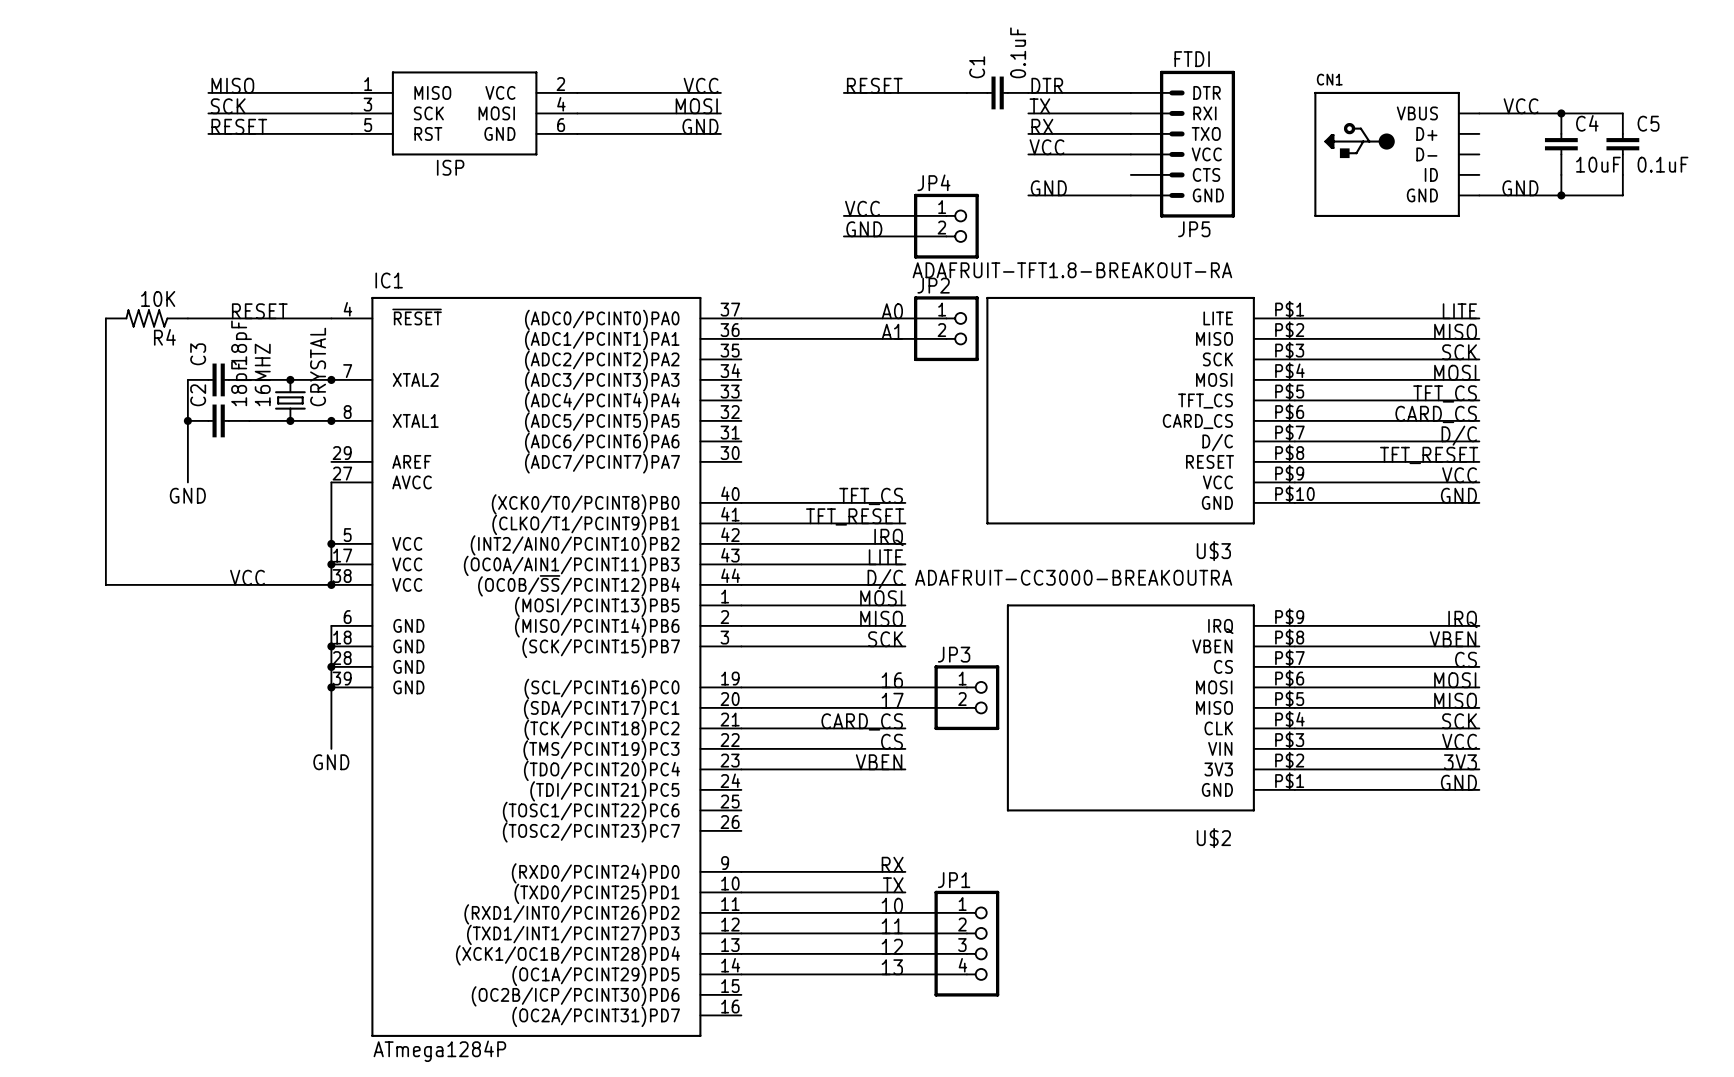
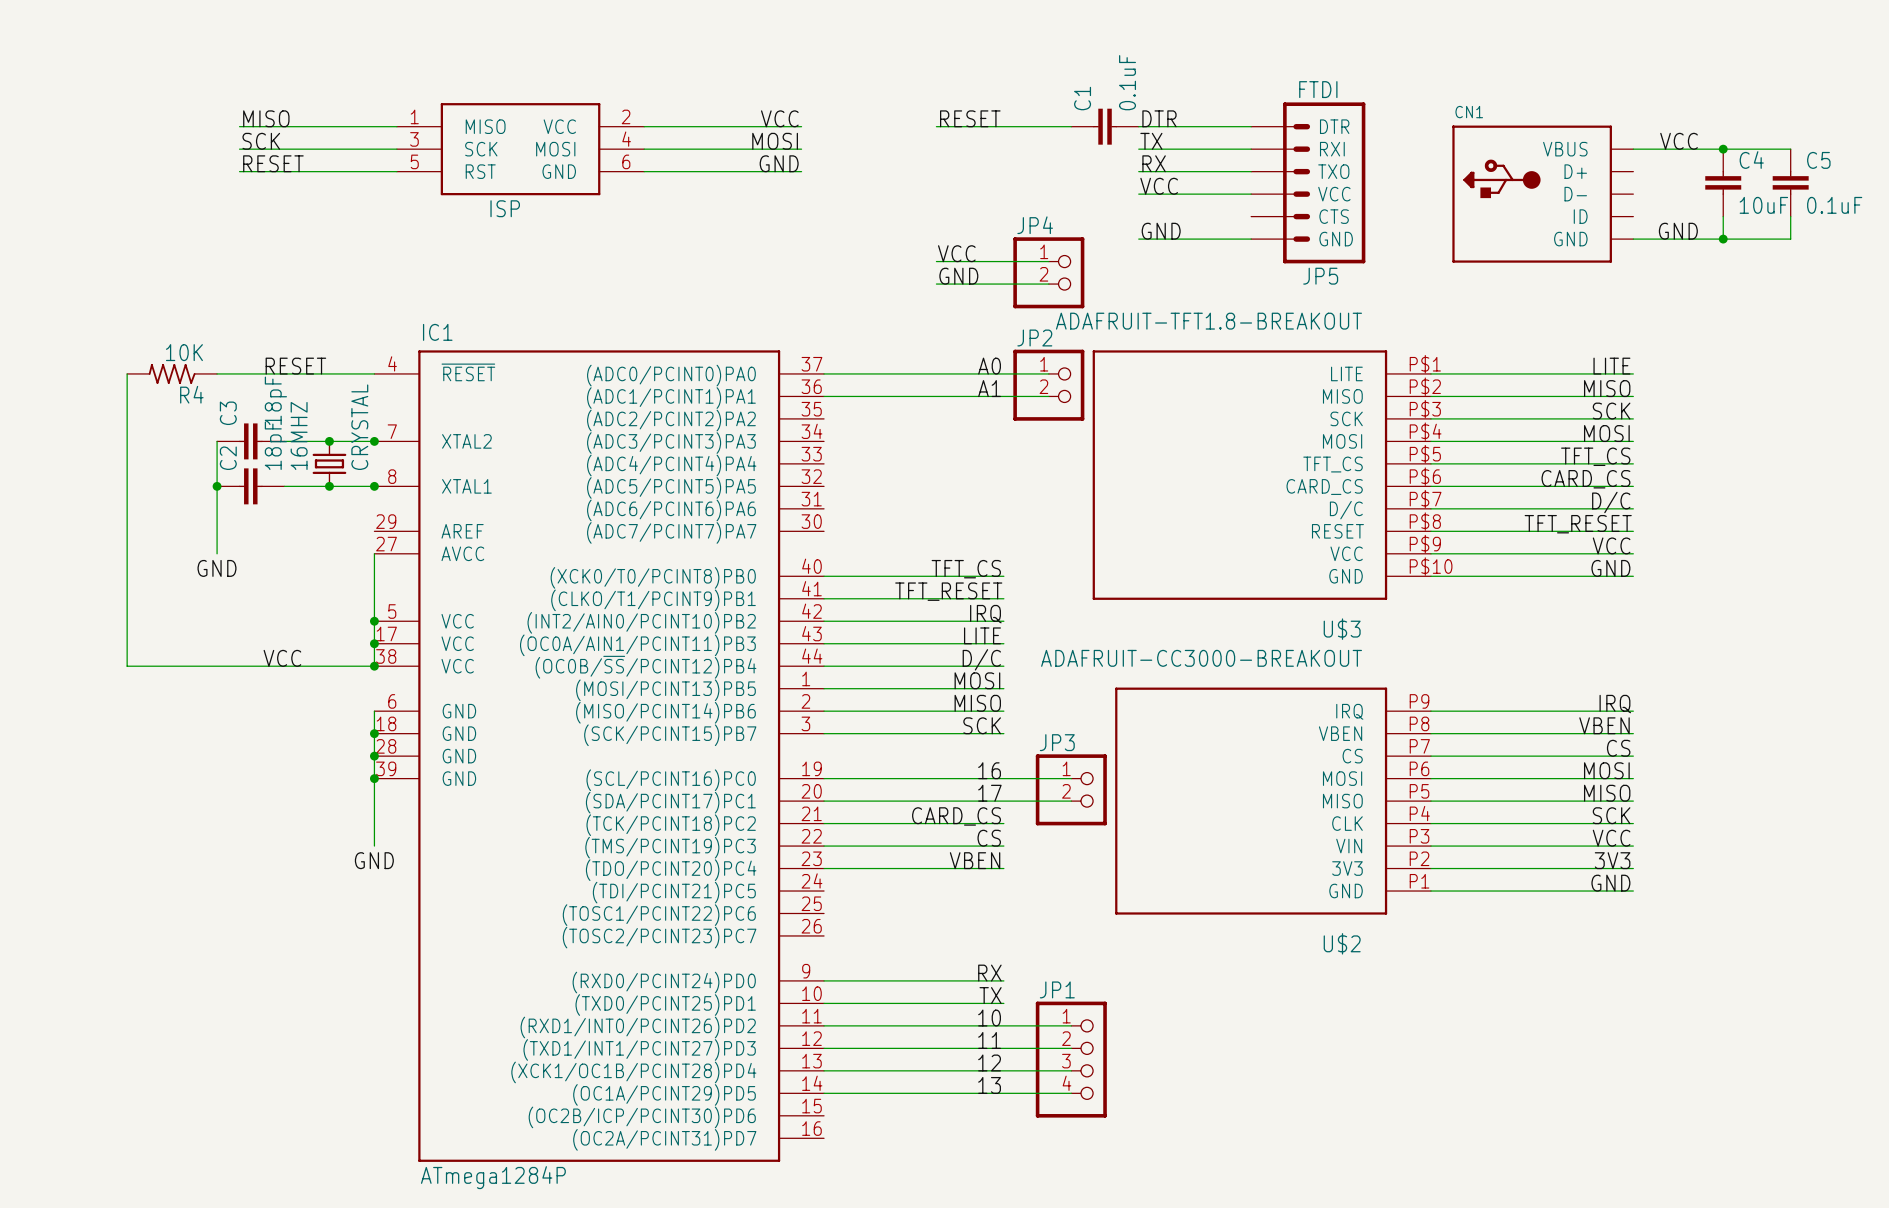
U$3 value: ADAFRUIT-TFT1.8-BREAKOUT-RA (1072, 270) -> ADAFRUIT-TFT1.8-BREAKOUT (1208, 321)
U$2 value: ADAFRUIT-CC3000-BREAKOUTRA (1073, 577) -> ADAFRUIT-CC3000-BREAKOUT (1201, 658)
U$2 symbol: [1006, 604, 1295, 812] -> [1115, 687, 1432, 915]

